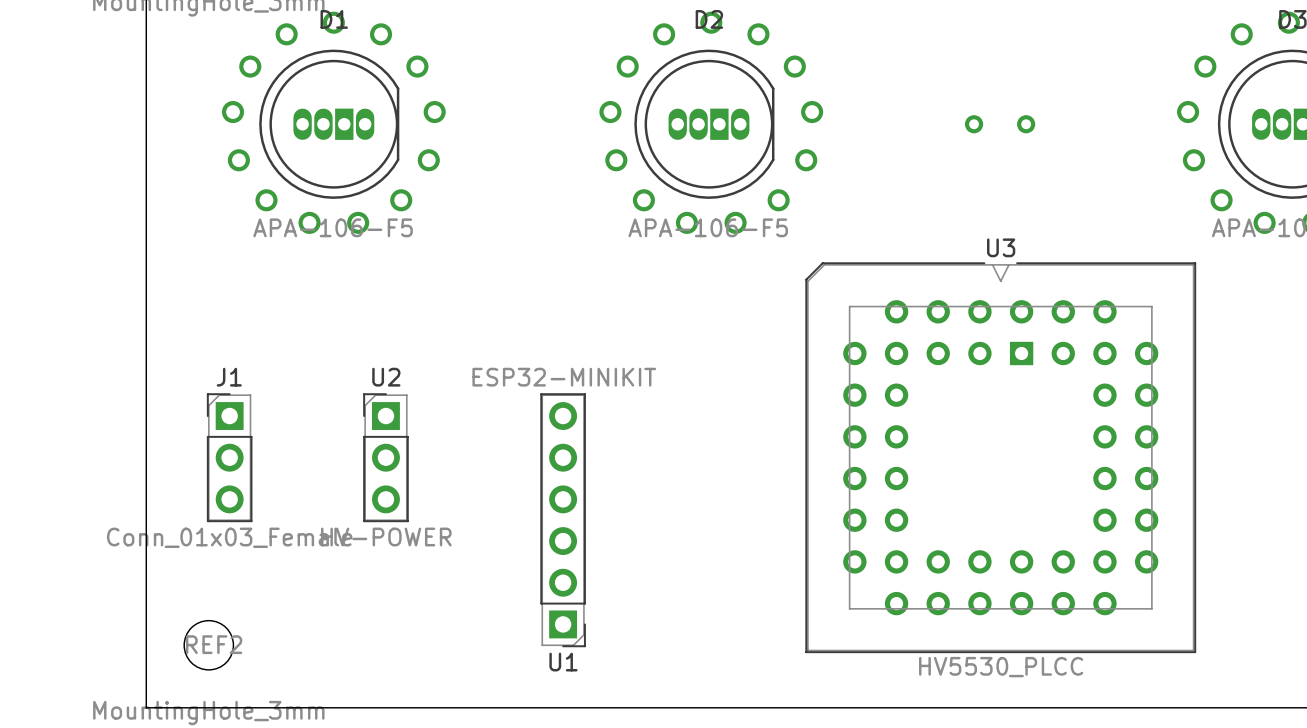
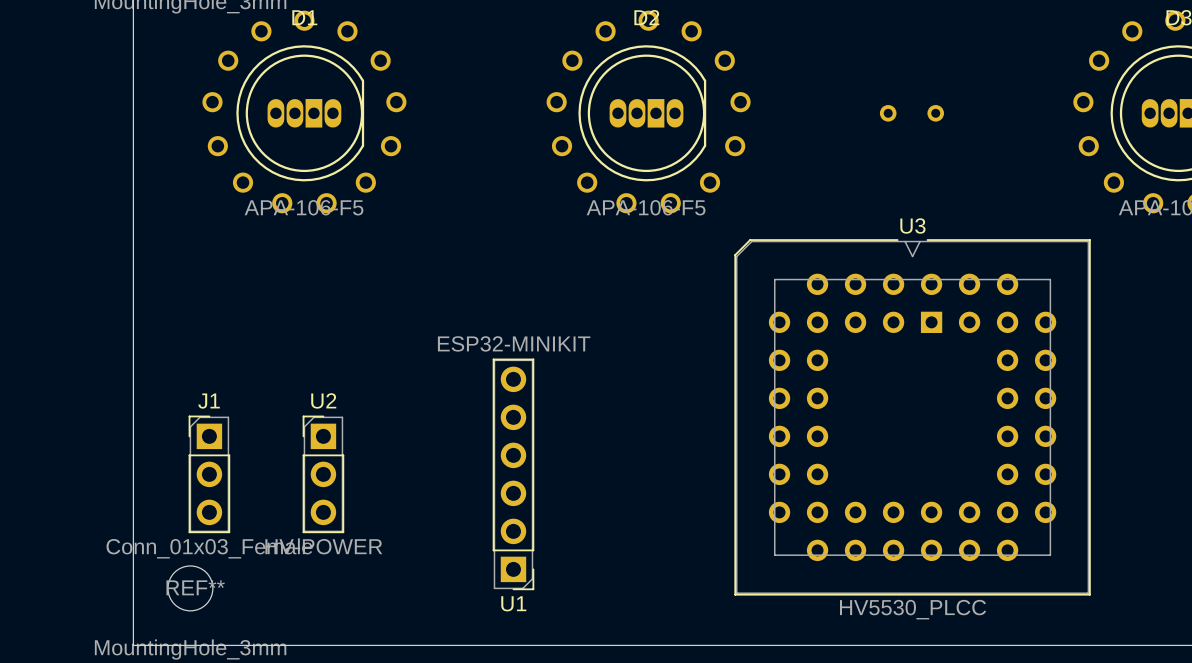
J1 position: (229, 457) -> (209, 474)
U2 position: (385, 457) -> (323, 474)
REF2 name: REF2 (214, 644) -> REF** (195, 587)

